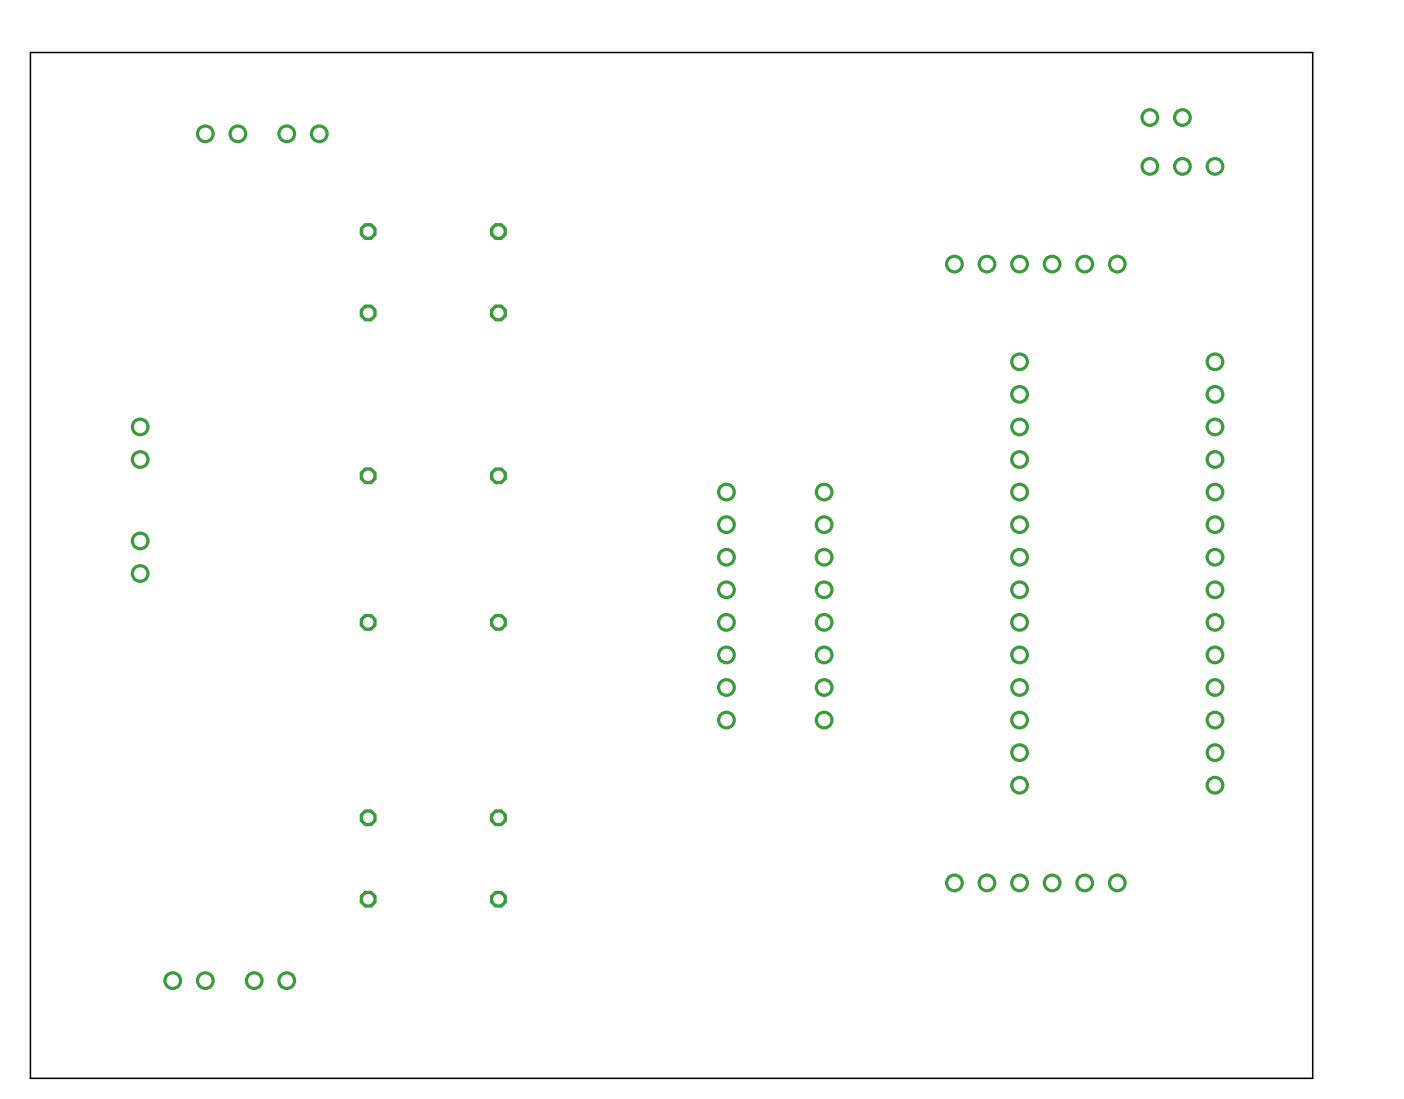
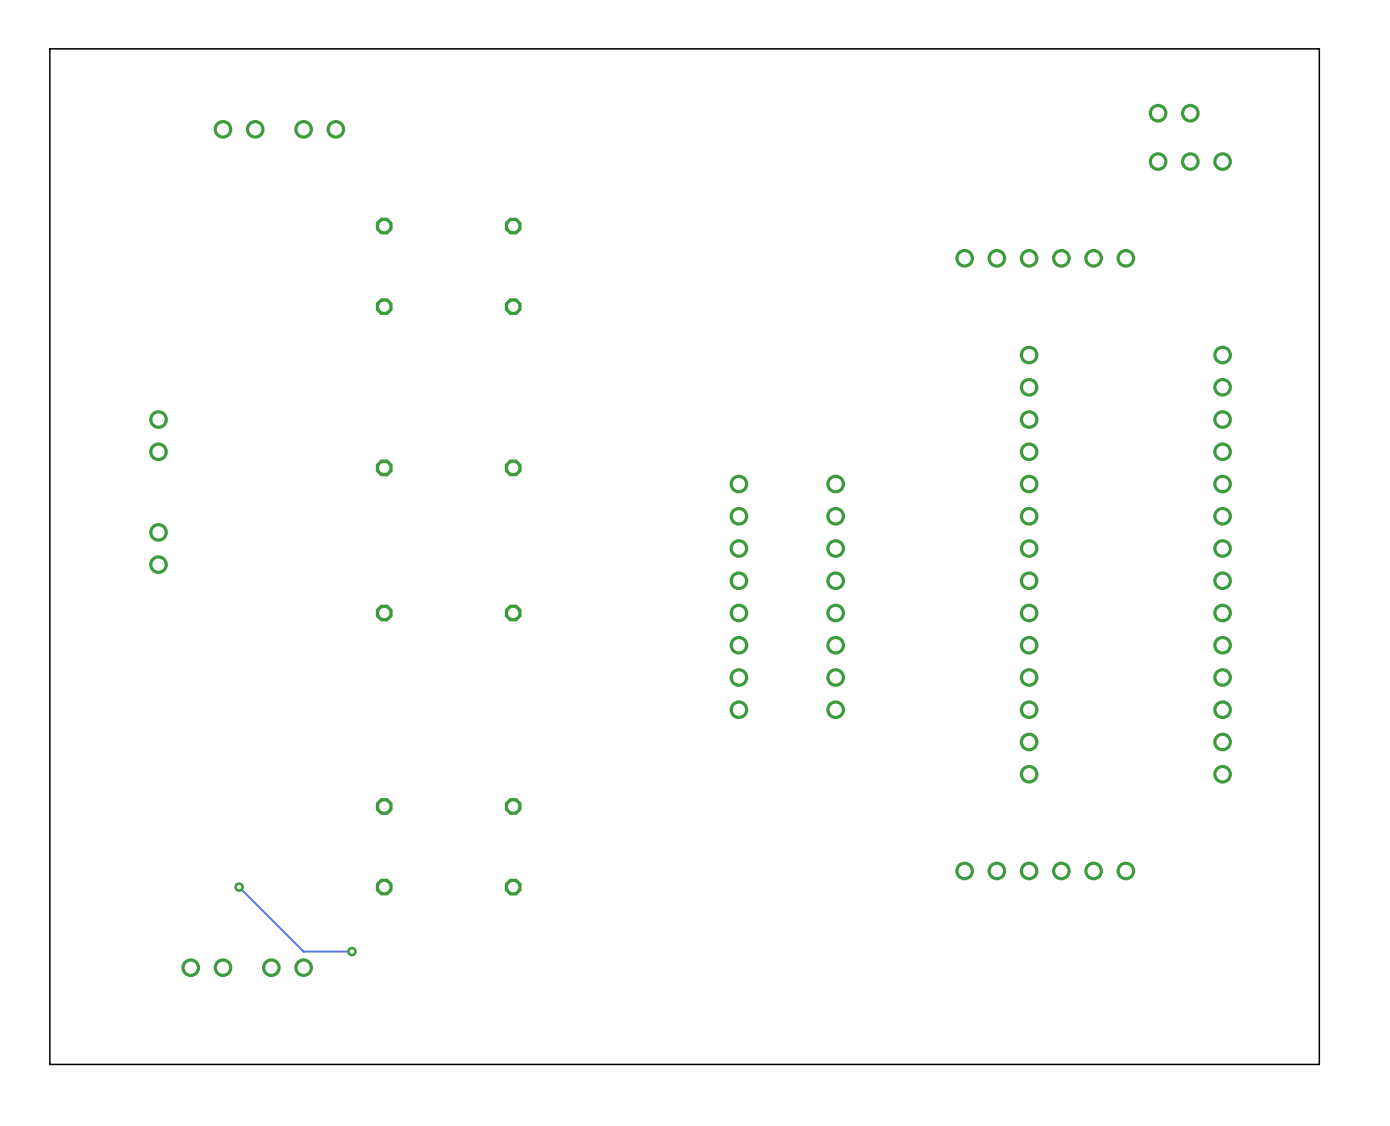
track: none -> (239, 887) (303, 951) (351, 951)
via: none -> (239, 887)
via: none -> (351, 951)

